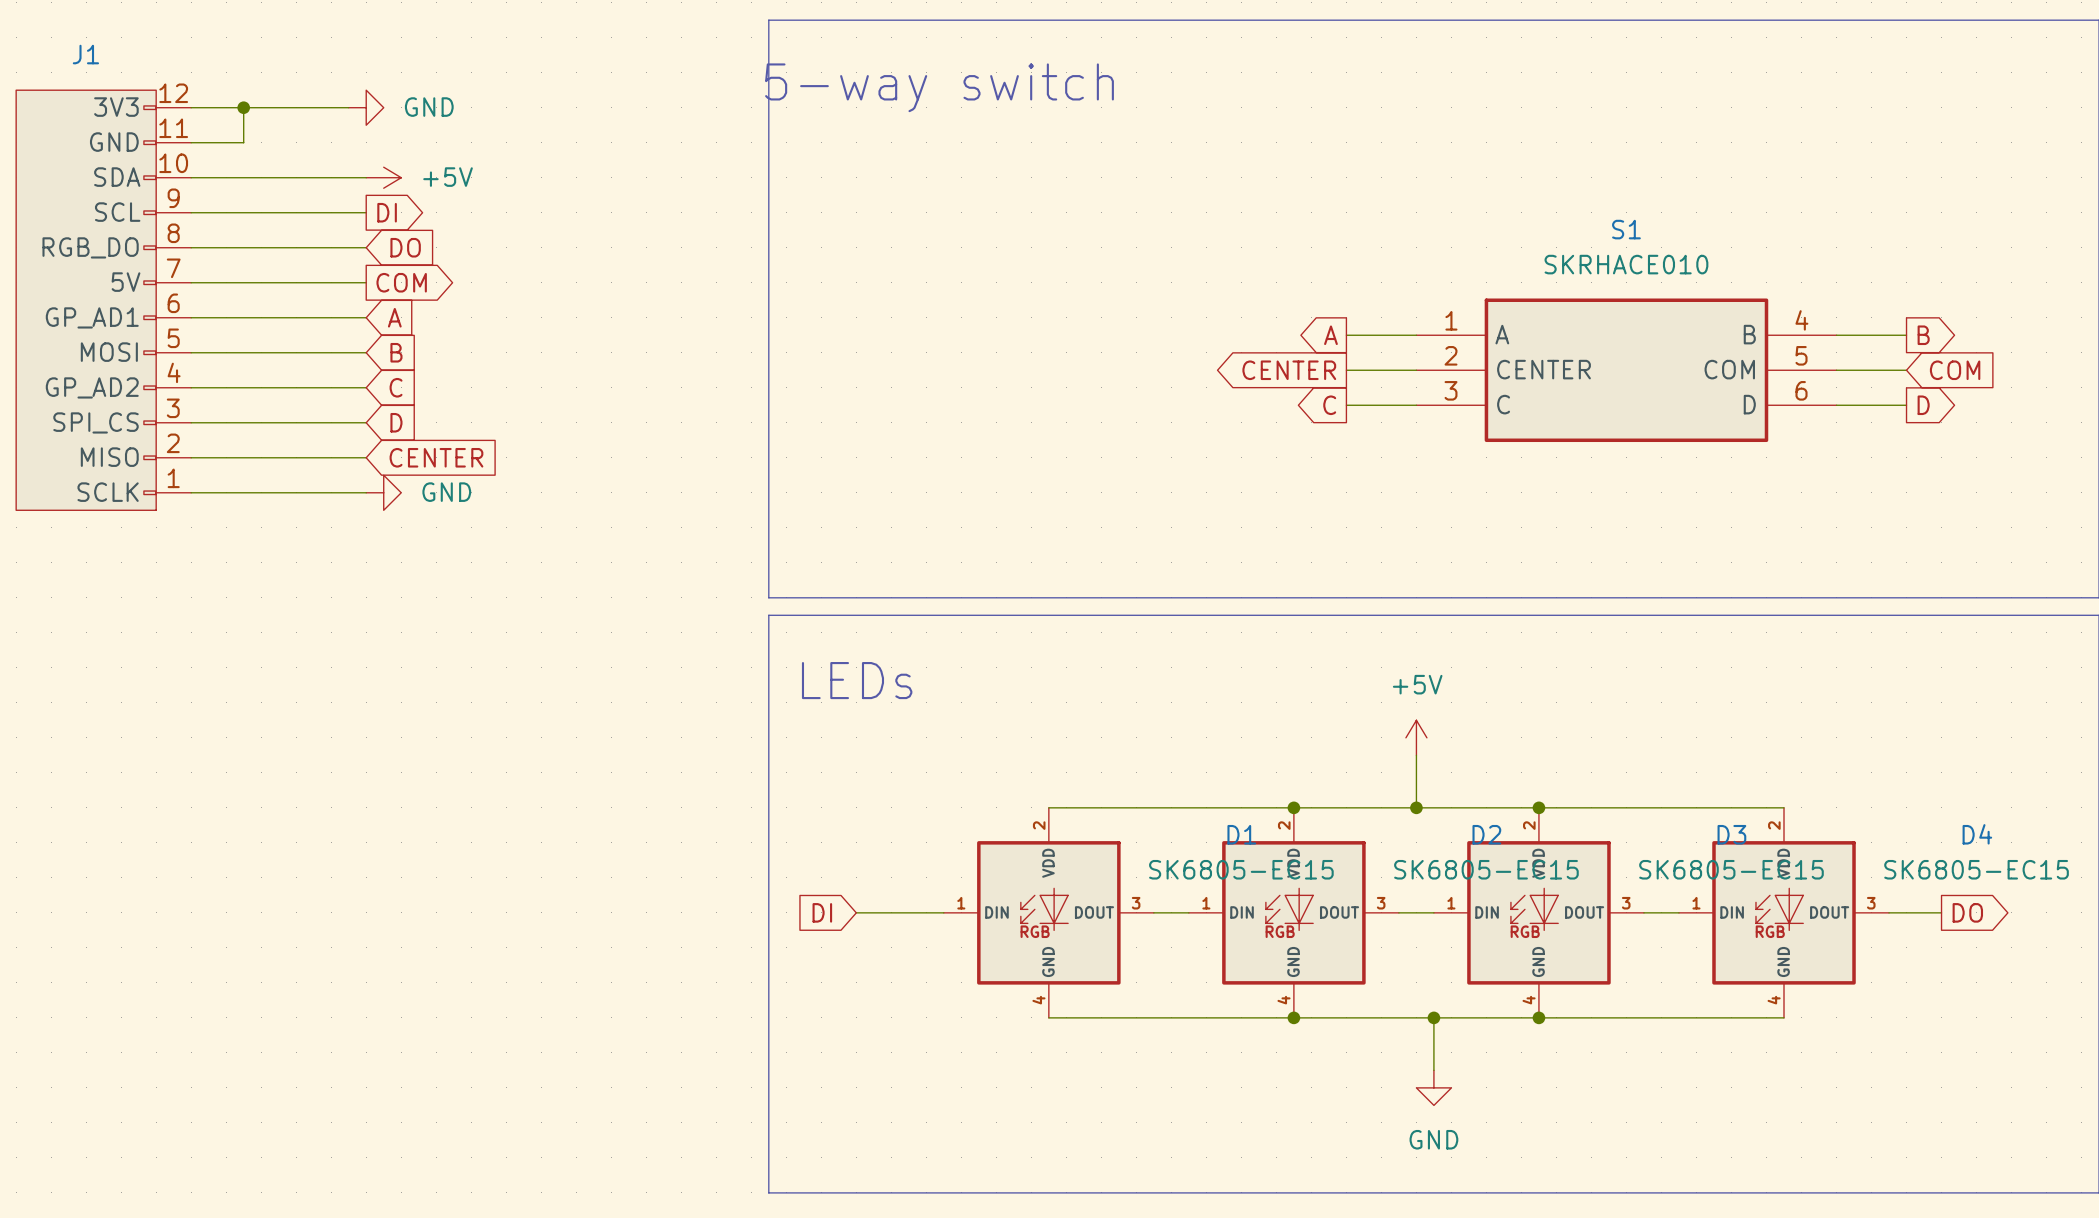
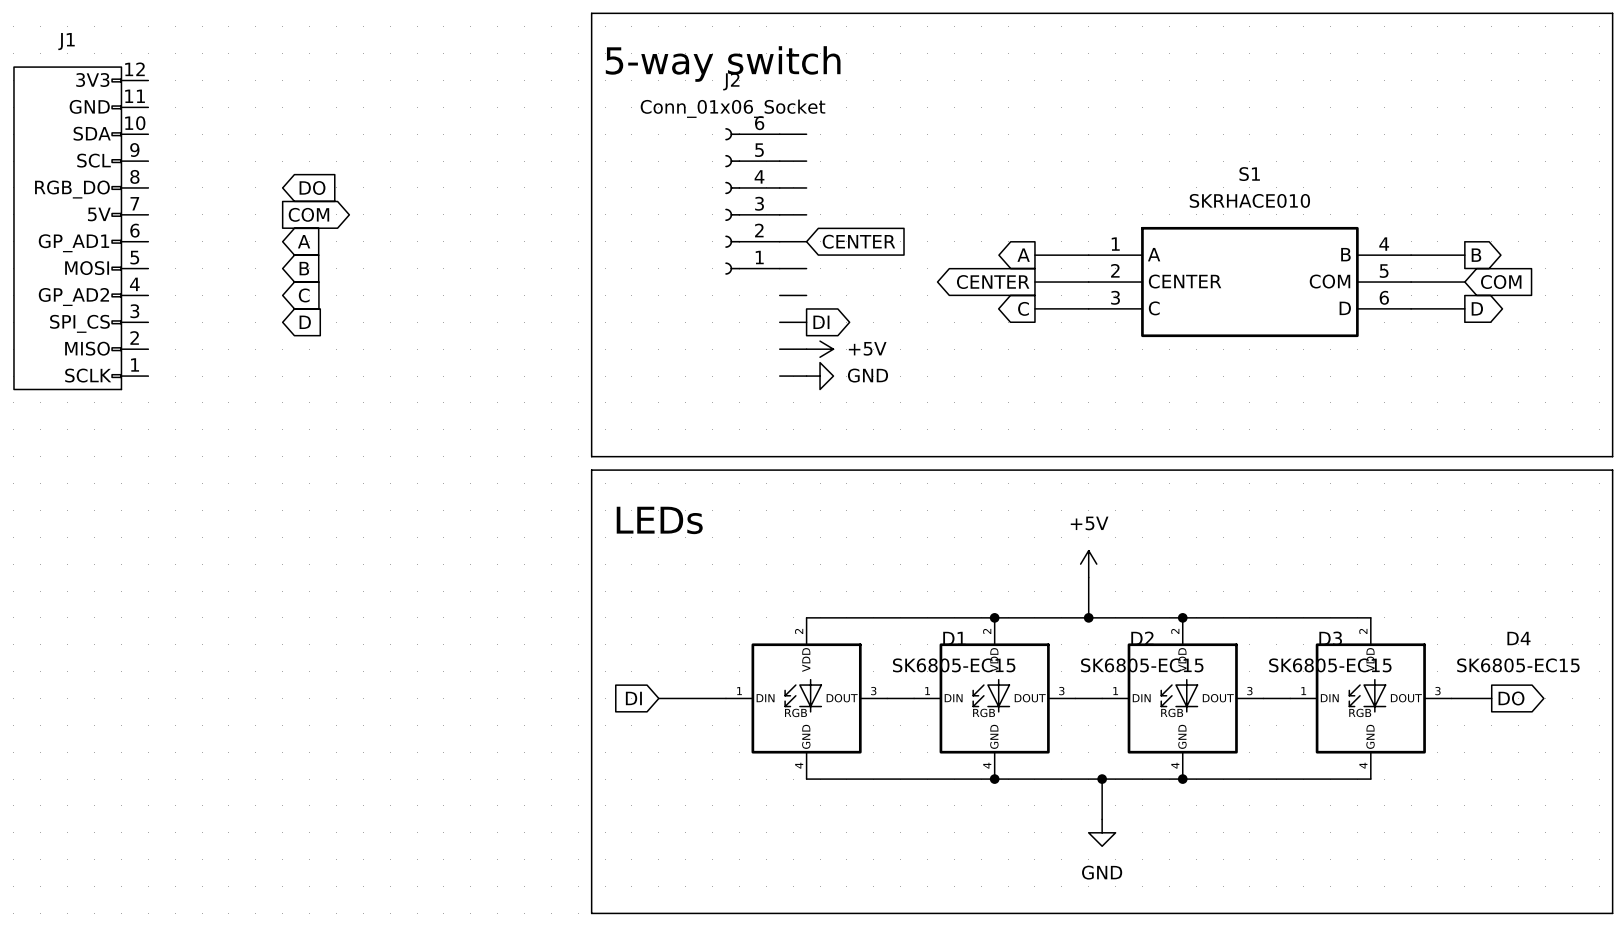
wire: (191, 107) (348, 107) -> none
wire: (243, 107) (243, 142) (191, 142) -> none
junction: (243, 107) -> none
power symbol: GND (366, 107) -> none
wire: (191, 177) (366, 177) -> none
power symbol: +5V (383, 177) -> none
wire: none -> (779, 134) (806, 134)
wire: (191, 212) (366, 212) -> none
global label: DI (387, 212) -> none
wire: none -> (779, 161) (806, 161)
wire: (191, 247) (366, 247) -> none
wire: none -> (779, 187) (806, 187)
J2: none -> Conn_01x06_Socket (752, 201)
wire: (191, 282) (366, 282) -> none
wire: none -> (779, 214) (806, 214)
wire: (191, 317) (366, 317) -> none
wire: none -> (779, 241) (806, 241)
global label: none -> CENTER (858, 241)
wire: (191, 352) (366, 352) -> none
wire: none -> (779, 268) (806, 268)
wire: (191, 387) (366, 387) -> none
wire: none -> (779, 295) (806, 295)
wire: (191, 422) (366, 422) -> none
wire: none -> (779, 322) (806, 322)
global label: none -> DI (821, 322)
wire: (191, 457) (366, 457) -> none
global label: CENTER (436, 457) -> none
wire: none -> (779, 349) (806, 349)
power symbol: none -> +5V (820, 349)
wire: (191, 492) (366, 492) -> none
power symbol: GND (383, 492) -> none
wire: none -> (779, 376) (806, 376)
power symbol: none -> GND (820, 376)

